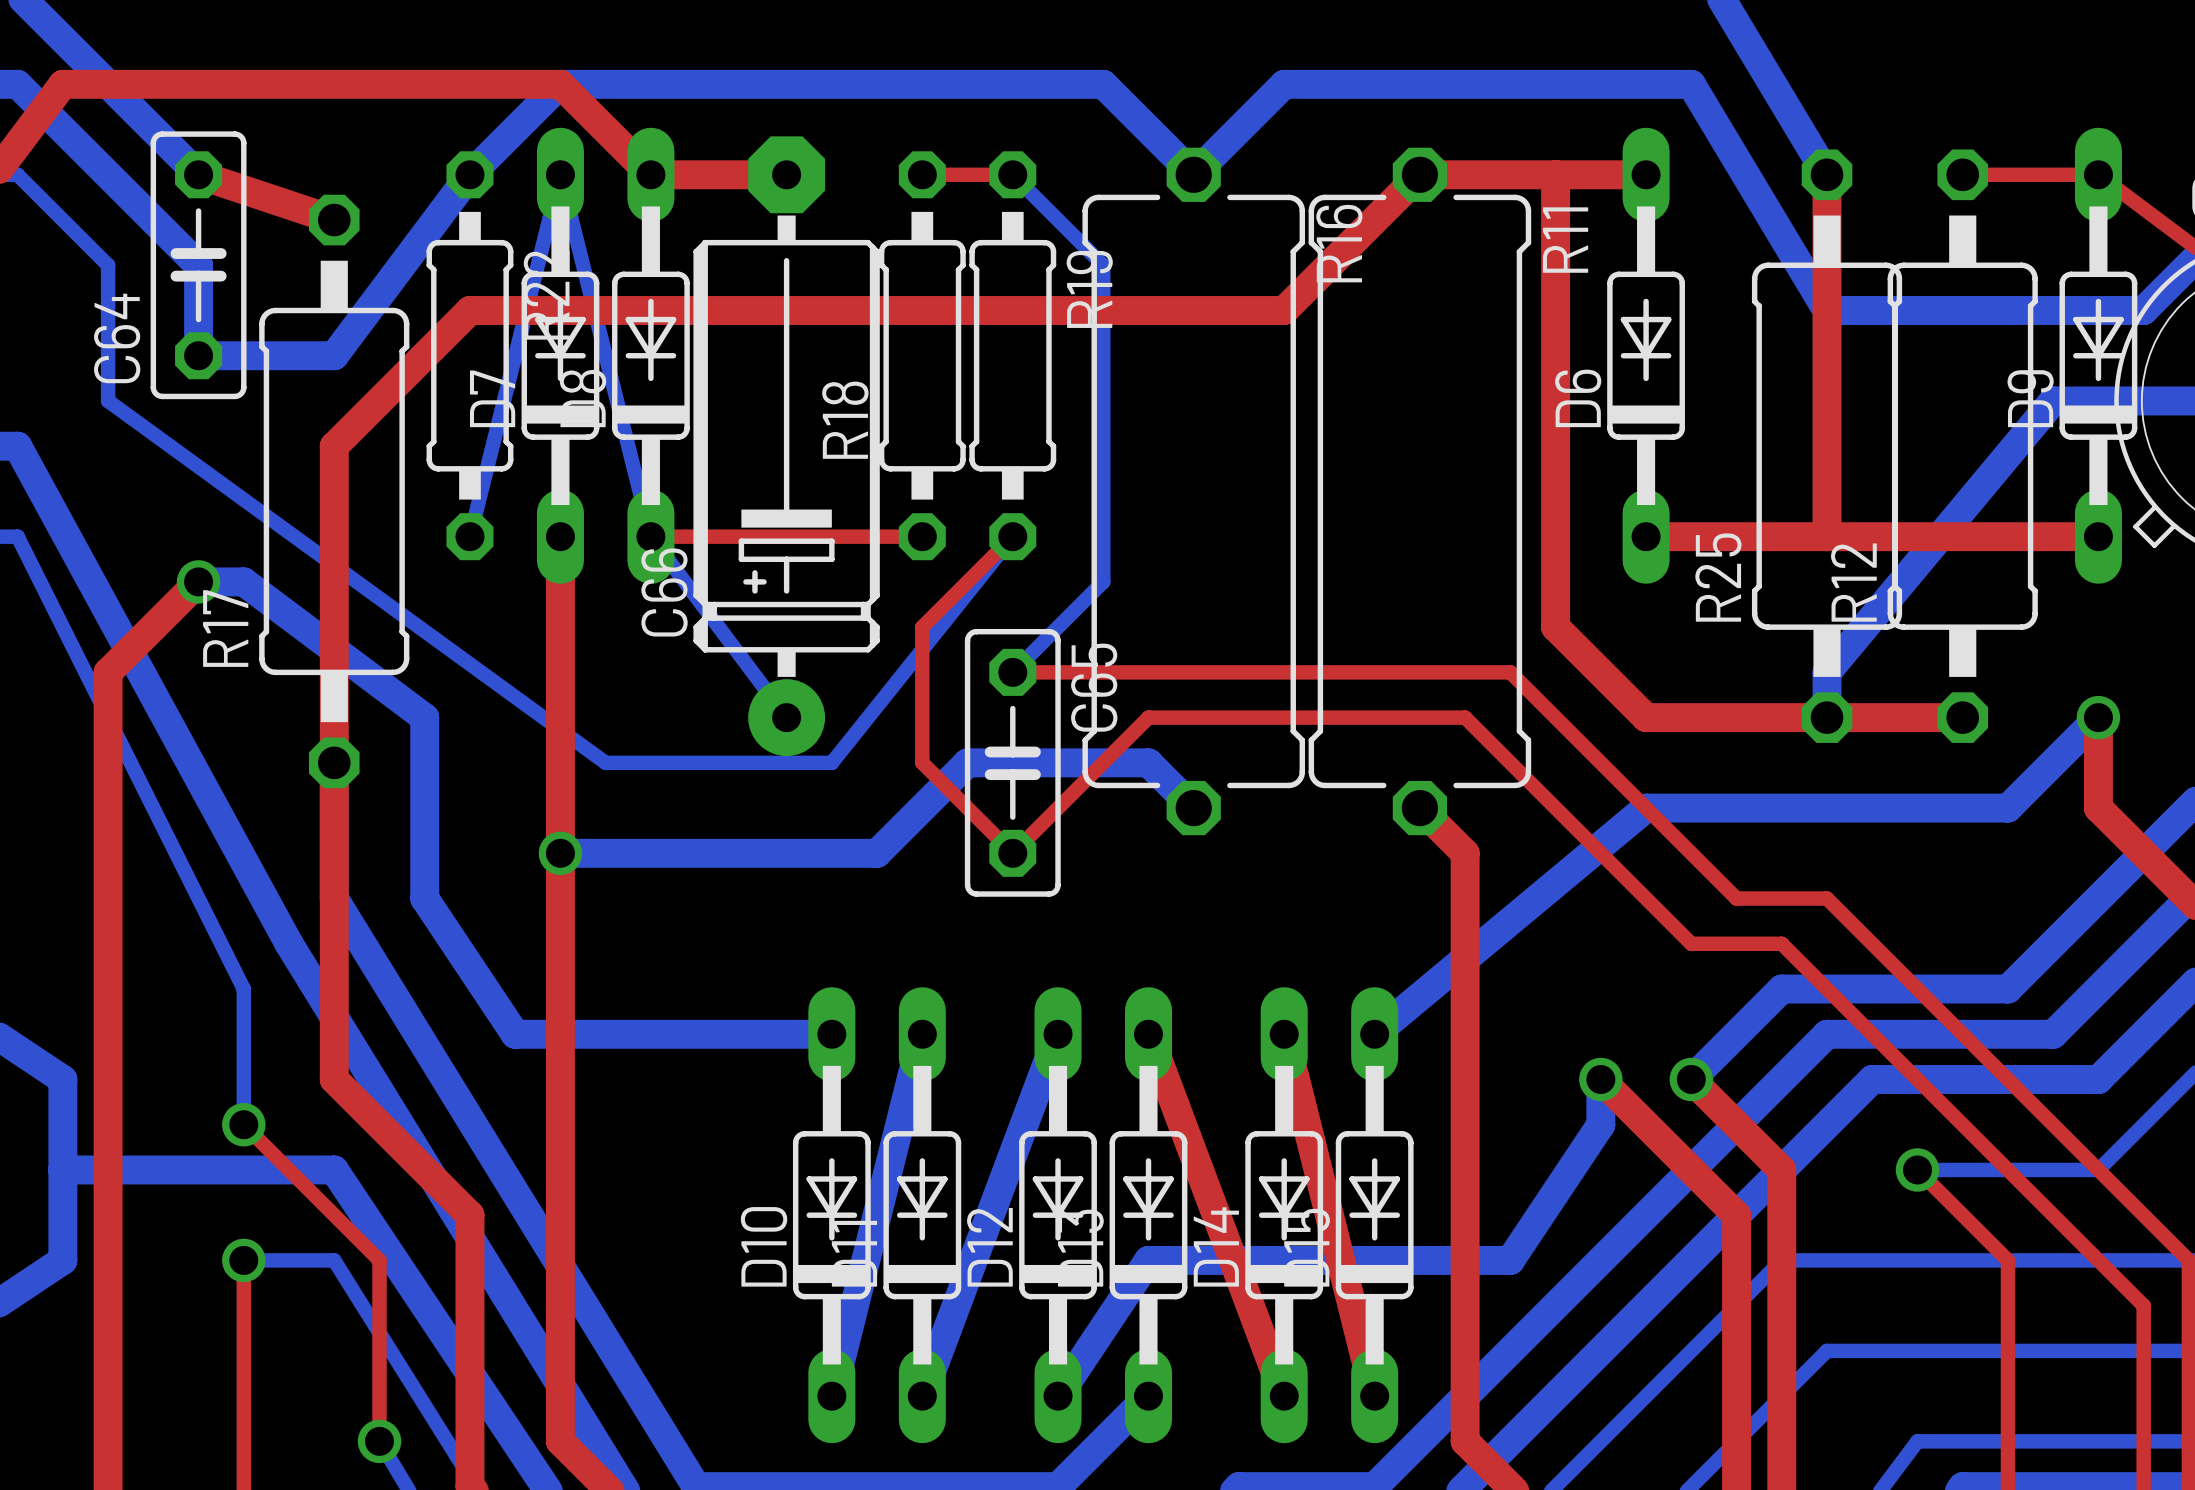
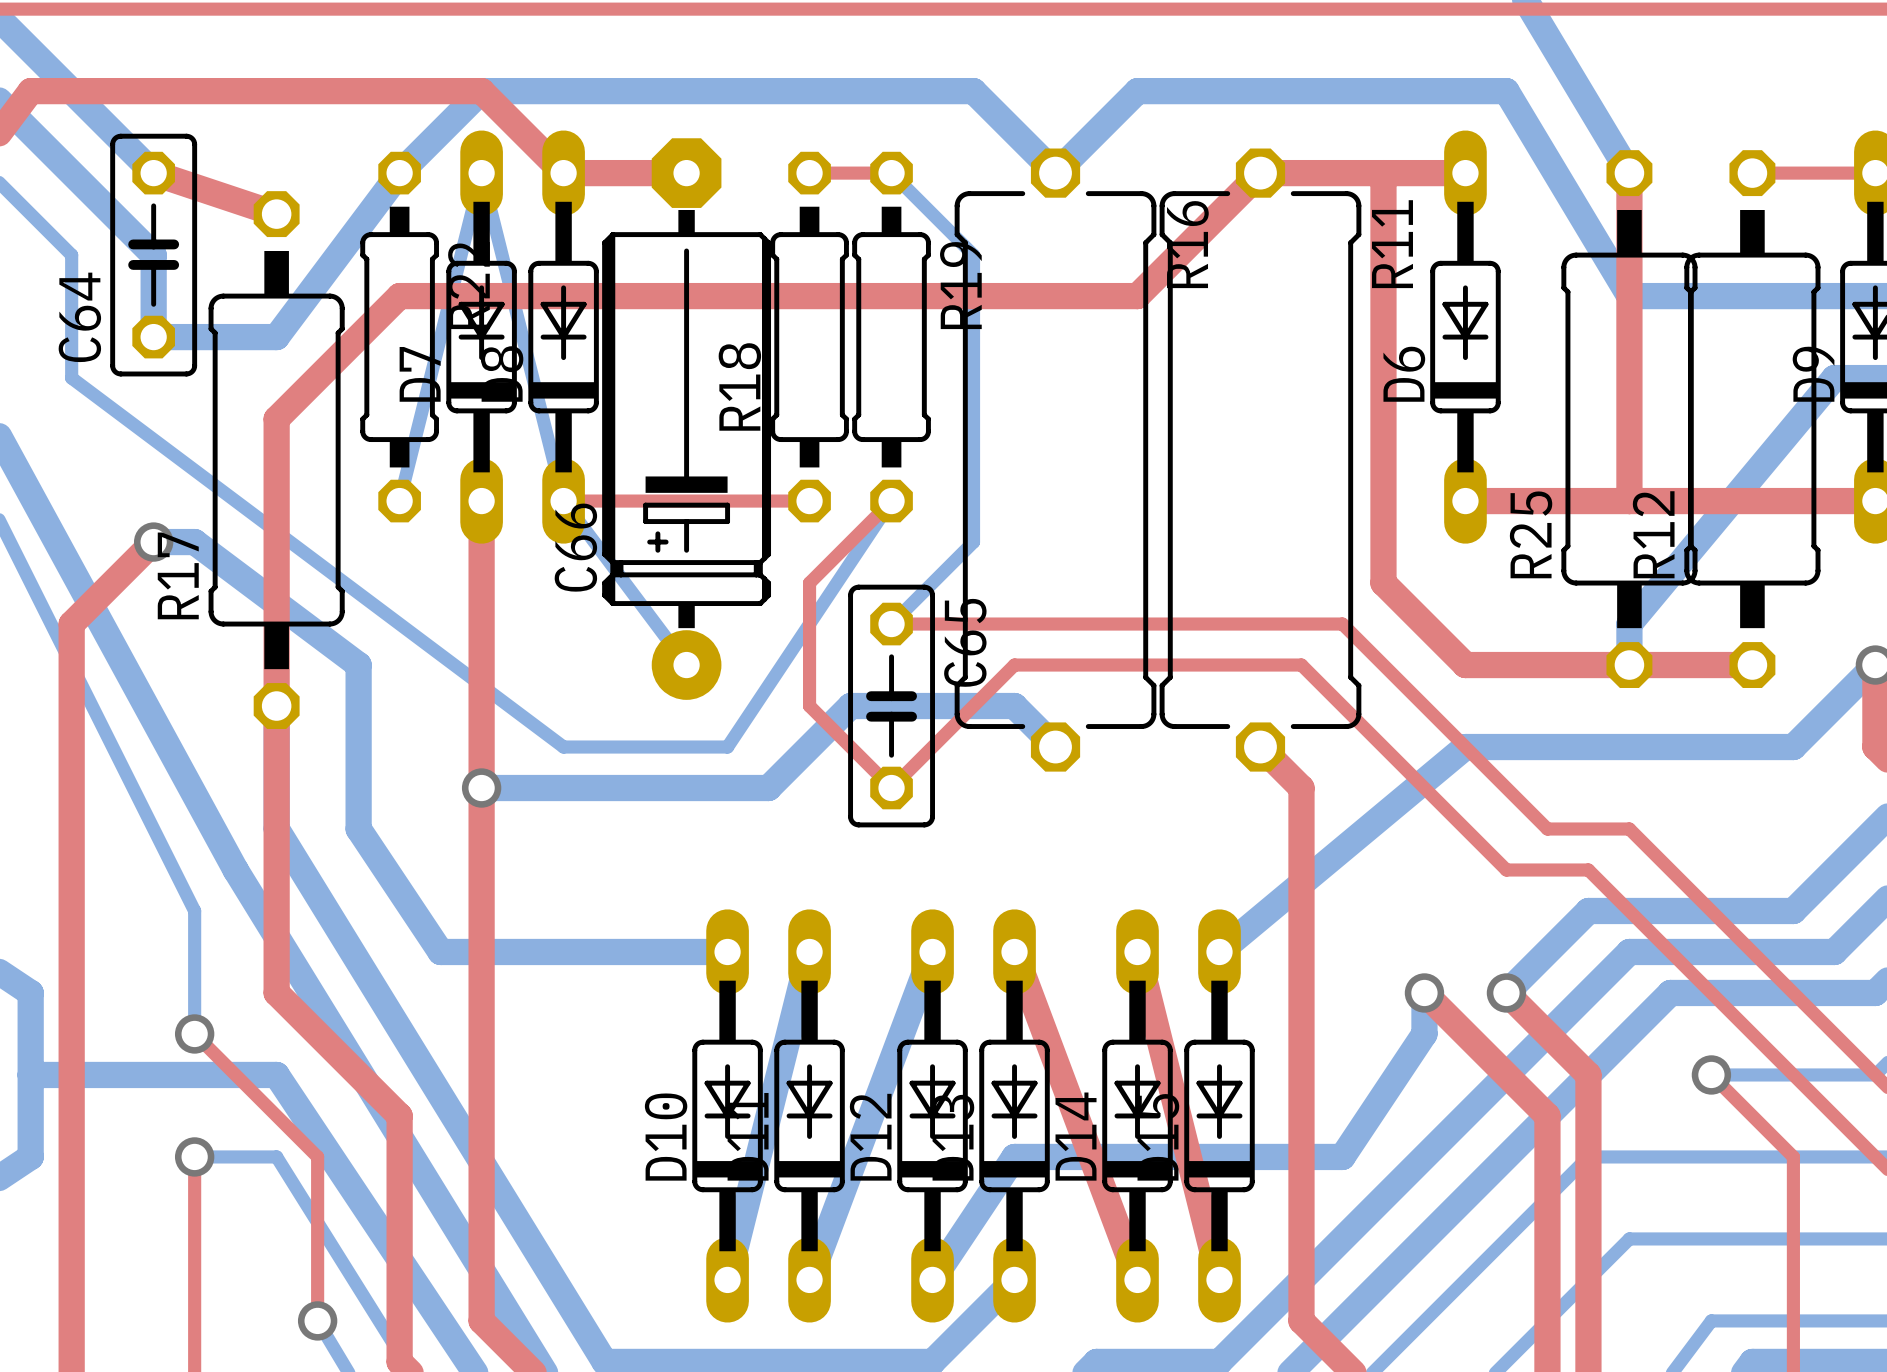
bottom track: (108, 400) (605, 762) (831, 762) (1012, 536) -> (71, 378) (563, 747) (727, 747) (891, 501)

